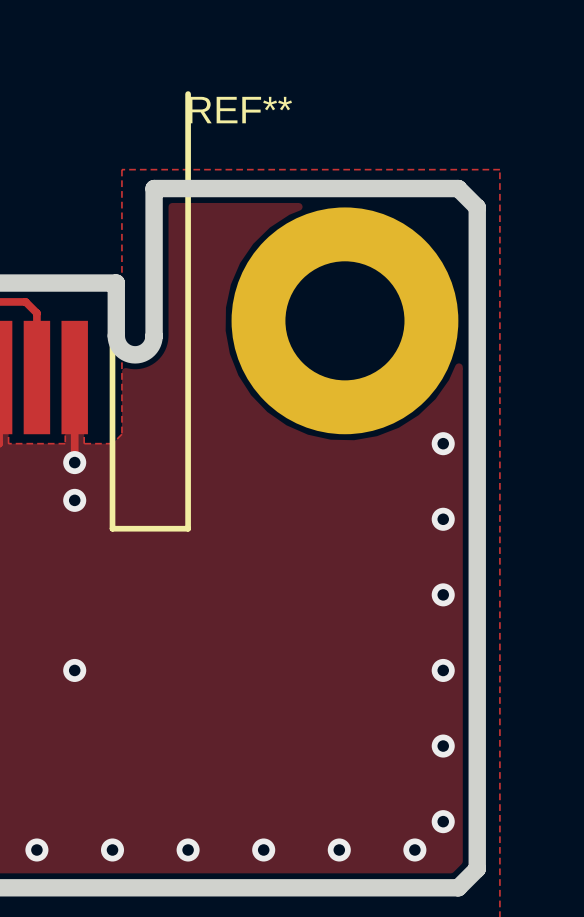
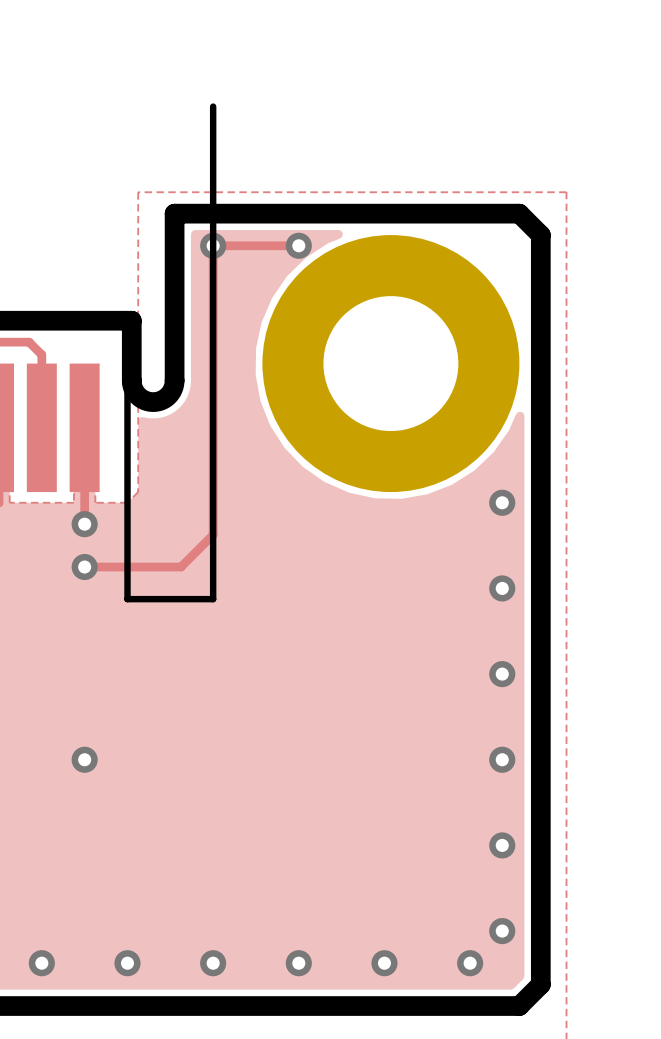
REF**: (240, 110) -> none
via: none -> (213, 245)
track: none -> (298, 245) (213, 245) (213, 534) (181, 567) (84, 567)
via: none -> (298, 245)

